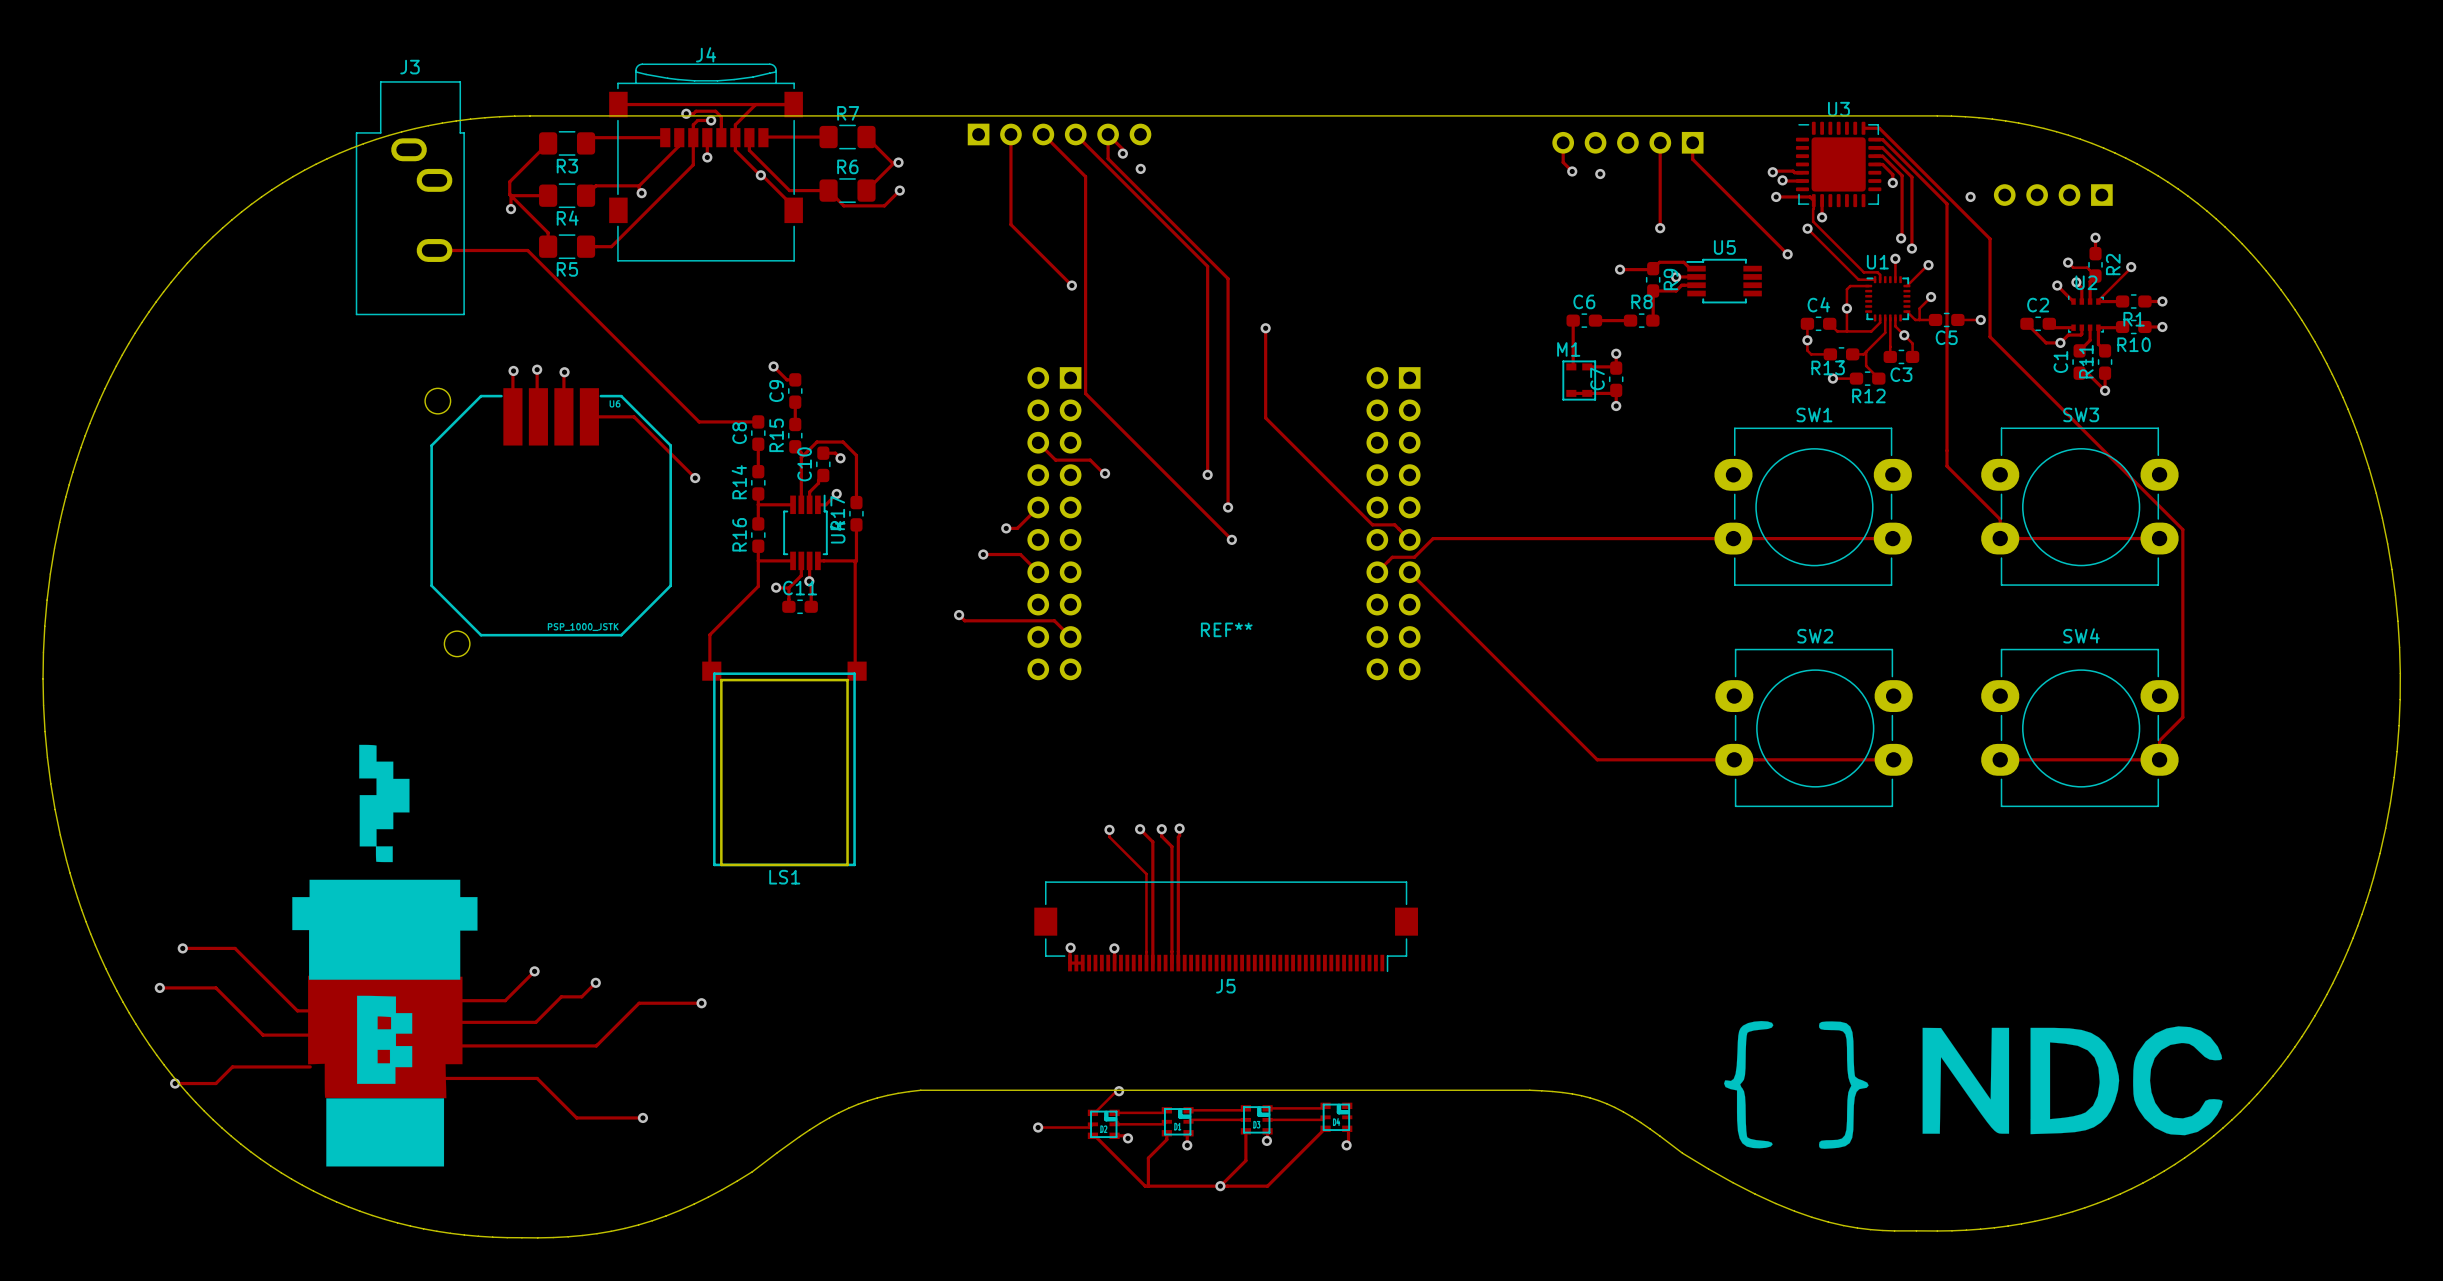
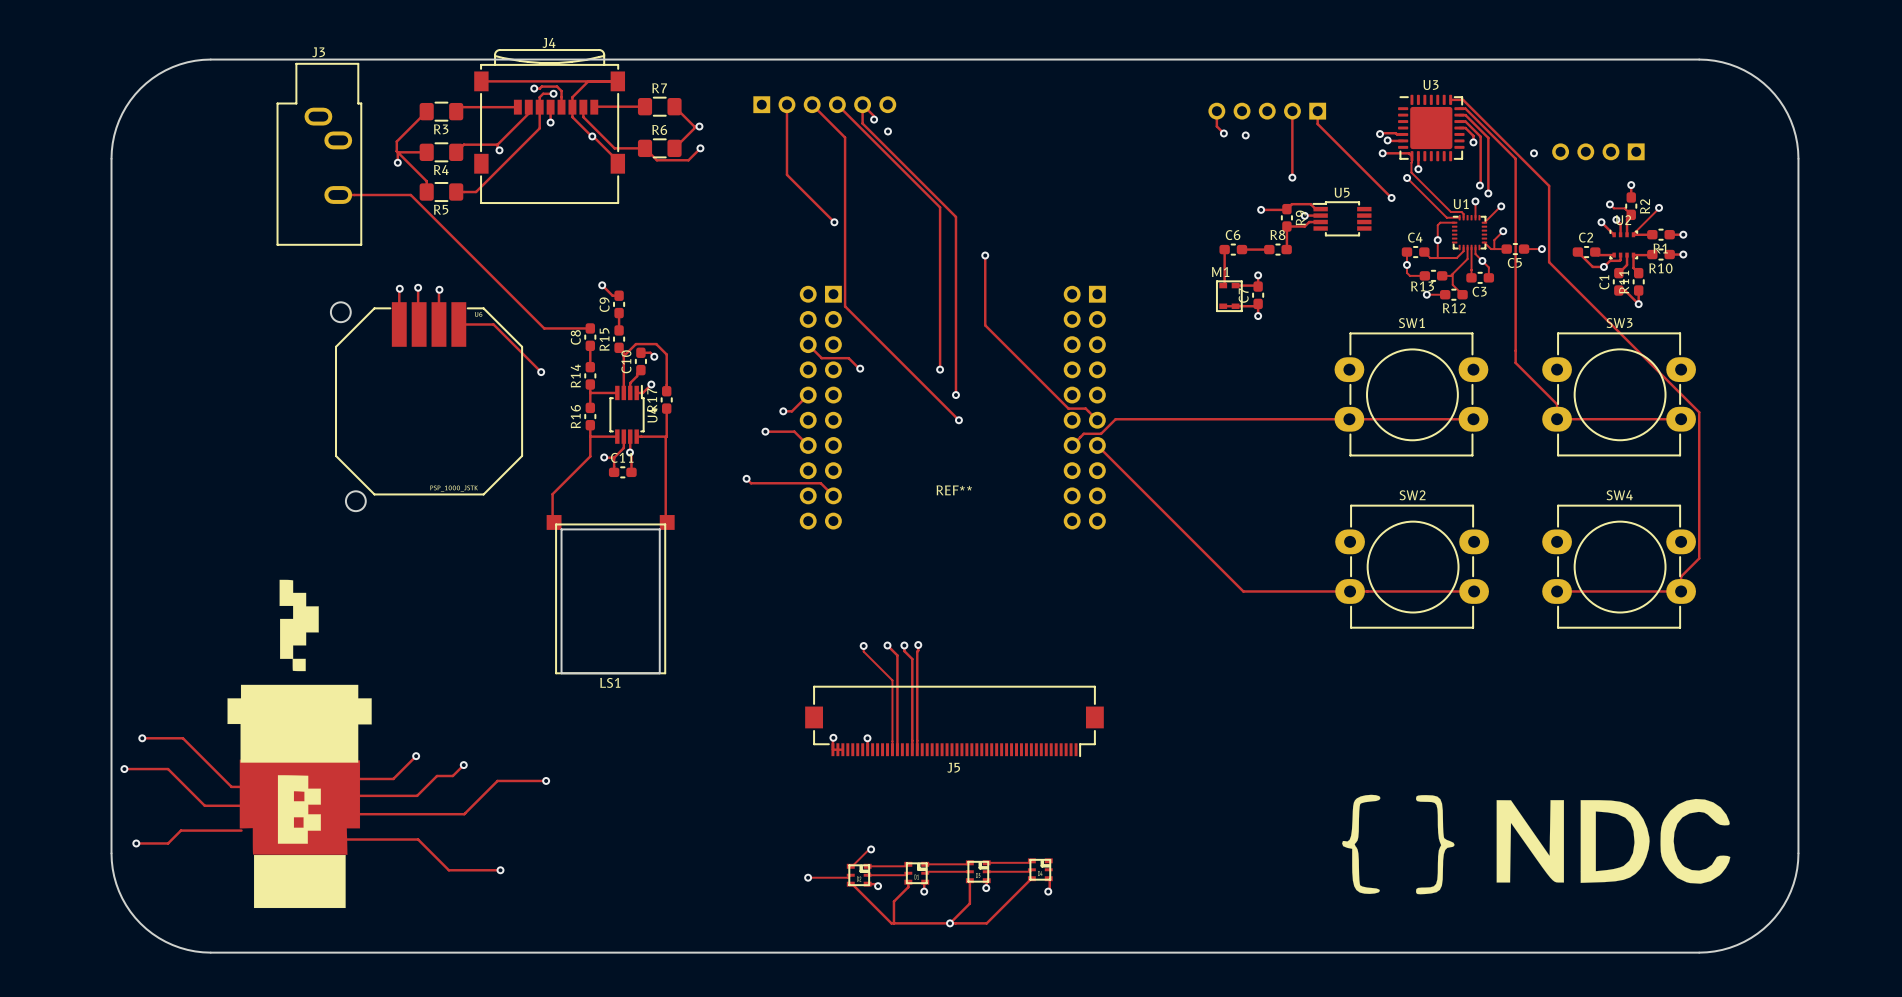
board edge: (529, 115) (1951, 116) (1992, 119) (2031, 125) (2068, 135) (2115, 153) (2158, 175) (2197, 203) (2233, 235) (2273, 280) (2302, 320) (2332, 374) (2357, 432) (2376, 493) (2387, 543) (2397, 621) (2400, 699) (2397, 751) (2385, 828) (2373, 878) (2357, 926) (2338, 972) (2308, 1026) (2273, 1075) (2231, 1120) (2194, 1150) (2142, 1183) (2097, 1203) (2047, 1218) (1994, 1227) (1952, 1230) (1882, 1230) (1843, 1225) (1812, 1217) (1775, 1203) (1732, 1182) (1682, 1153) (1631, 1116) (1606, 1103) (1572, 1093) (1529, 1090) (909, 1091) (867, 1100) (839, 1112) (810, 1129) (737, 1181) (679, 1210) (638, 1224) (582, 1235) (507, 1237) (450, 1233) (384, 1219) (324, 1196) (291, 1179) (250, 1151) (222, 1128) (187, 1093) (163, 1064) (135, 1023) (117, 991) (95, 945) (81, 909) (66, 860) (55, 809) (47, 757) (43, 705) (43, 652) (47, 600) (54, 548) (65, 497) (80, 447) (99, 400) (116, 365) (141, 322) (163, 291) (195, 254) (222, 228) (261, 196) (293, 176) (327, 158) (363, 143) (401, 131) (442, 123) (485, 117) (529, 115) -> (210, 59) (187, 62) (172, 67) (146, 83) (135, 94) (122, 113) (116, 128) (111, 150) (111, 861) (119, 891) (130, 911) (146, 928) (165, 941) (187, 949) (210, 952) (1699, 952) (1729, 947) (1751, 938) (1769, 923) (1787, 898) (1795, 876) (1798, 853) (1798, 150) (1790, 120) (1779, 100) (1763, 83) (1744, 70) (1722, 62) (1699, 59) (210, 59)

